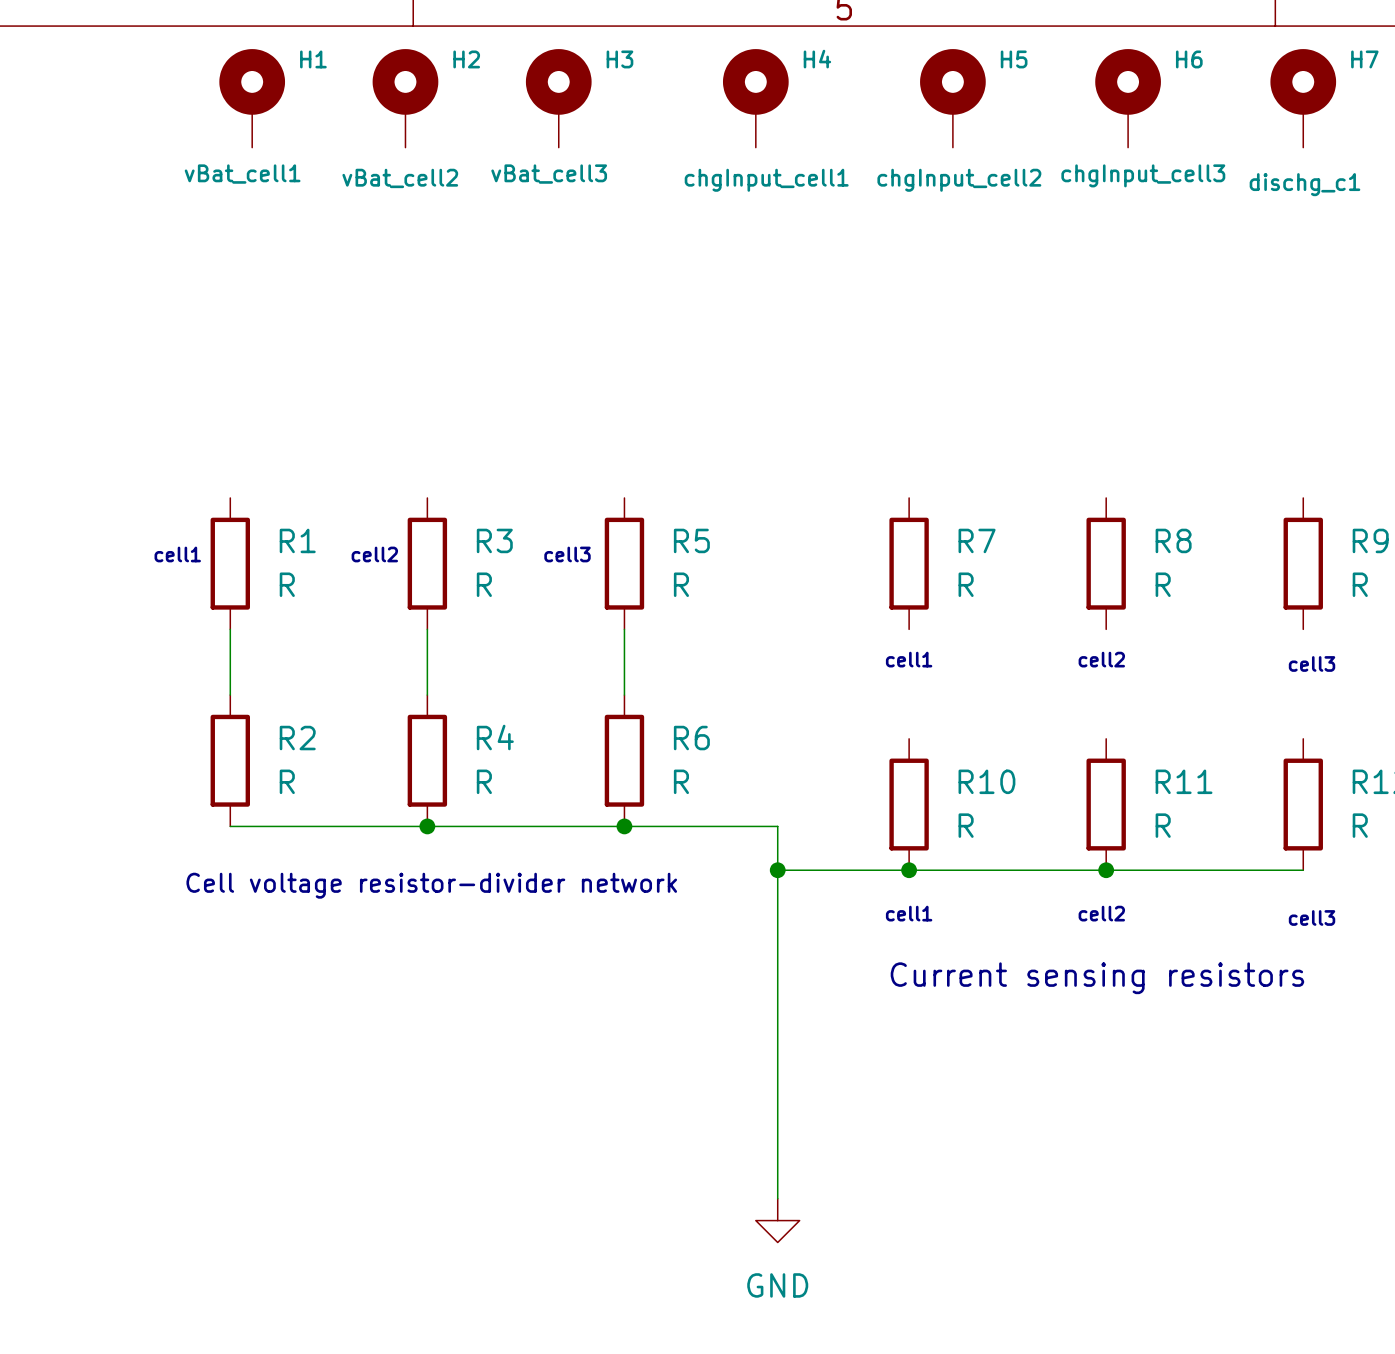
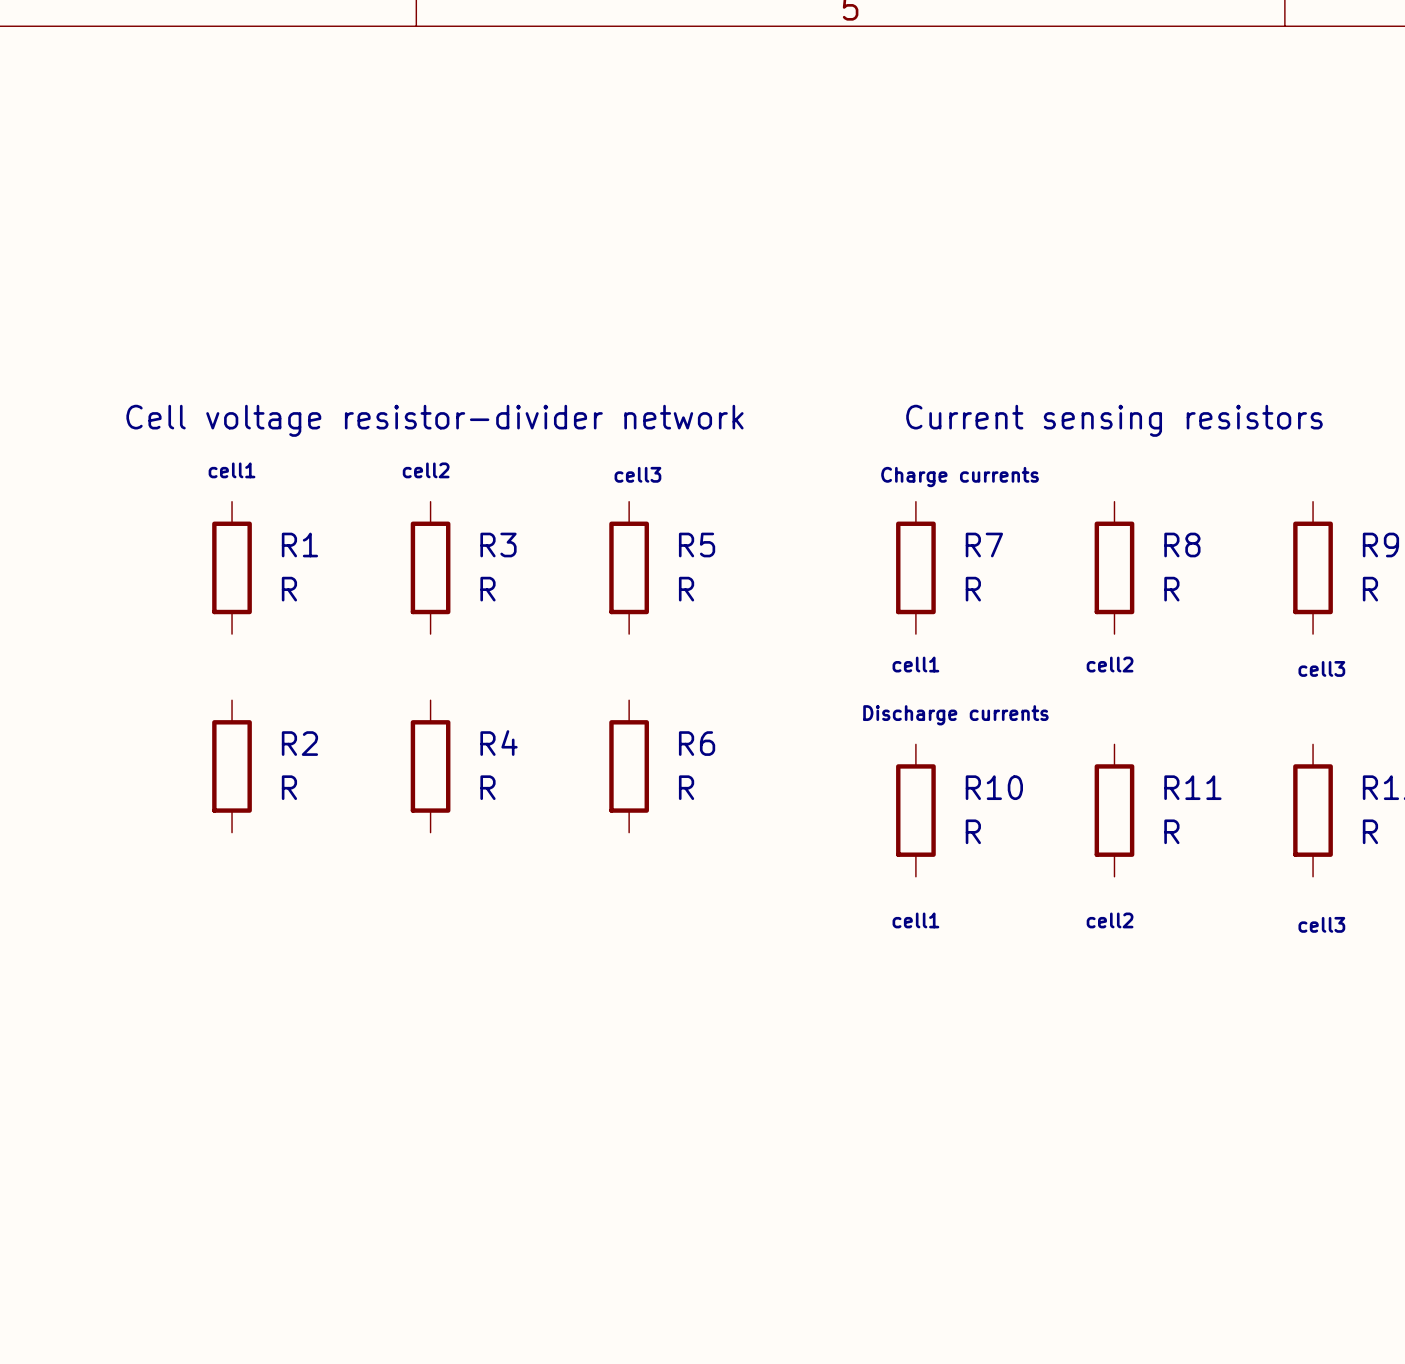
H1: vBat_cell1 (252, 98) -> none
H2: vBat_cell2 (405, 98) -> none
H3: vBat_cell3 (558, 98) -> none
H4: chgInput_cell1 (755, 98) -> none
H5: chgInput_cell2 (952, 98) -> none
H6: chgInput_cell3 (1128, 98) -> none
H7: dischg_c1 (1303, 98) -> none
text: none -> Cell voltage resistor-divider network (434, 420)
text: none -> Current sensing resistors (1114, 420)
text: none -> Charge currents (960, 477)
text position: cell1 (177, 554) -> cell1 (232, 470)
text position: cell2 (374, 554) -> cell2 (426, 470)
text position: cell3 (567, 554) -> cell3 (637, 474)
wire: (230, 629) (230, 695) -> none
wire: (427, 629) (427, 695) -> none
wire: (624, 629) (624, 695) -> none
text: none -> Discharge currents (955, 715)
wire: (230, 826) (777, 826) (777, 1198) -> none
junction: (427, 826) -> none
junction: (624, 826) -> none
wire: (777, 870) (1303, 870) -> none
junction: (777, 870) -> none
junction: (909, 870) -> none
junction: (1106, 870) -> none
text: Cell voltage resistor-divider network (431, 885) -> none
text: Current sensing resistors (1097, 978) -> none
power symbol: GND (777, 1220) -> none

